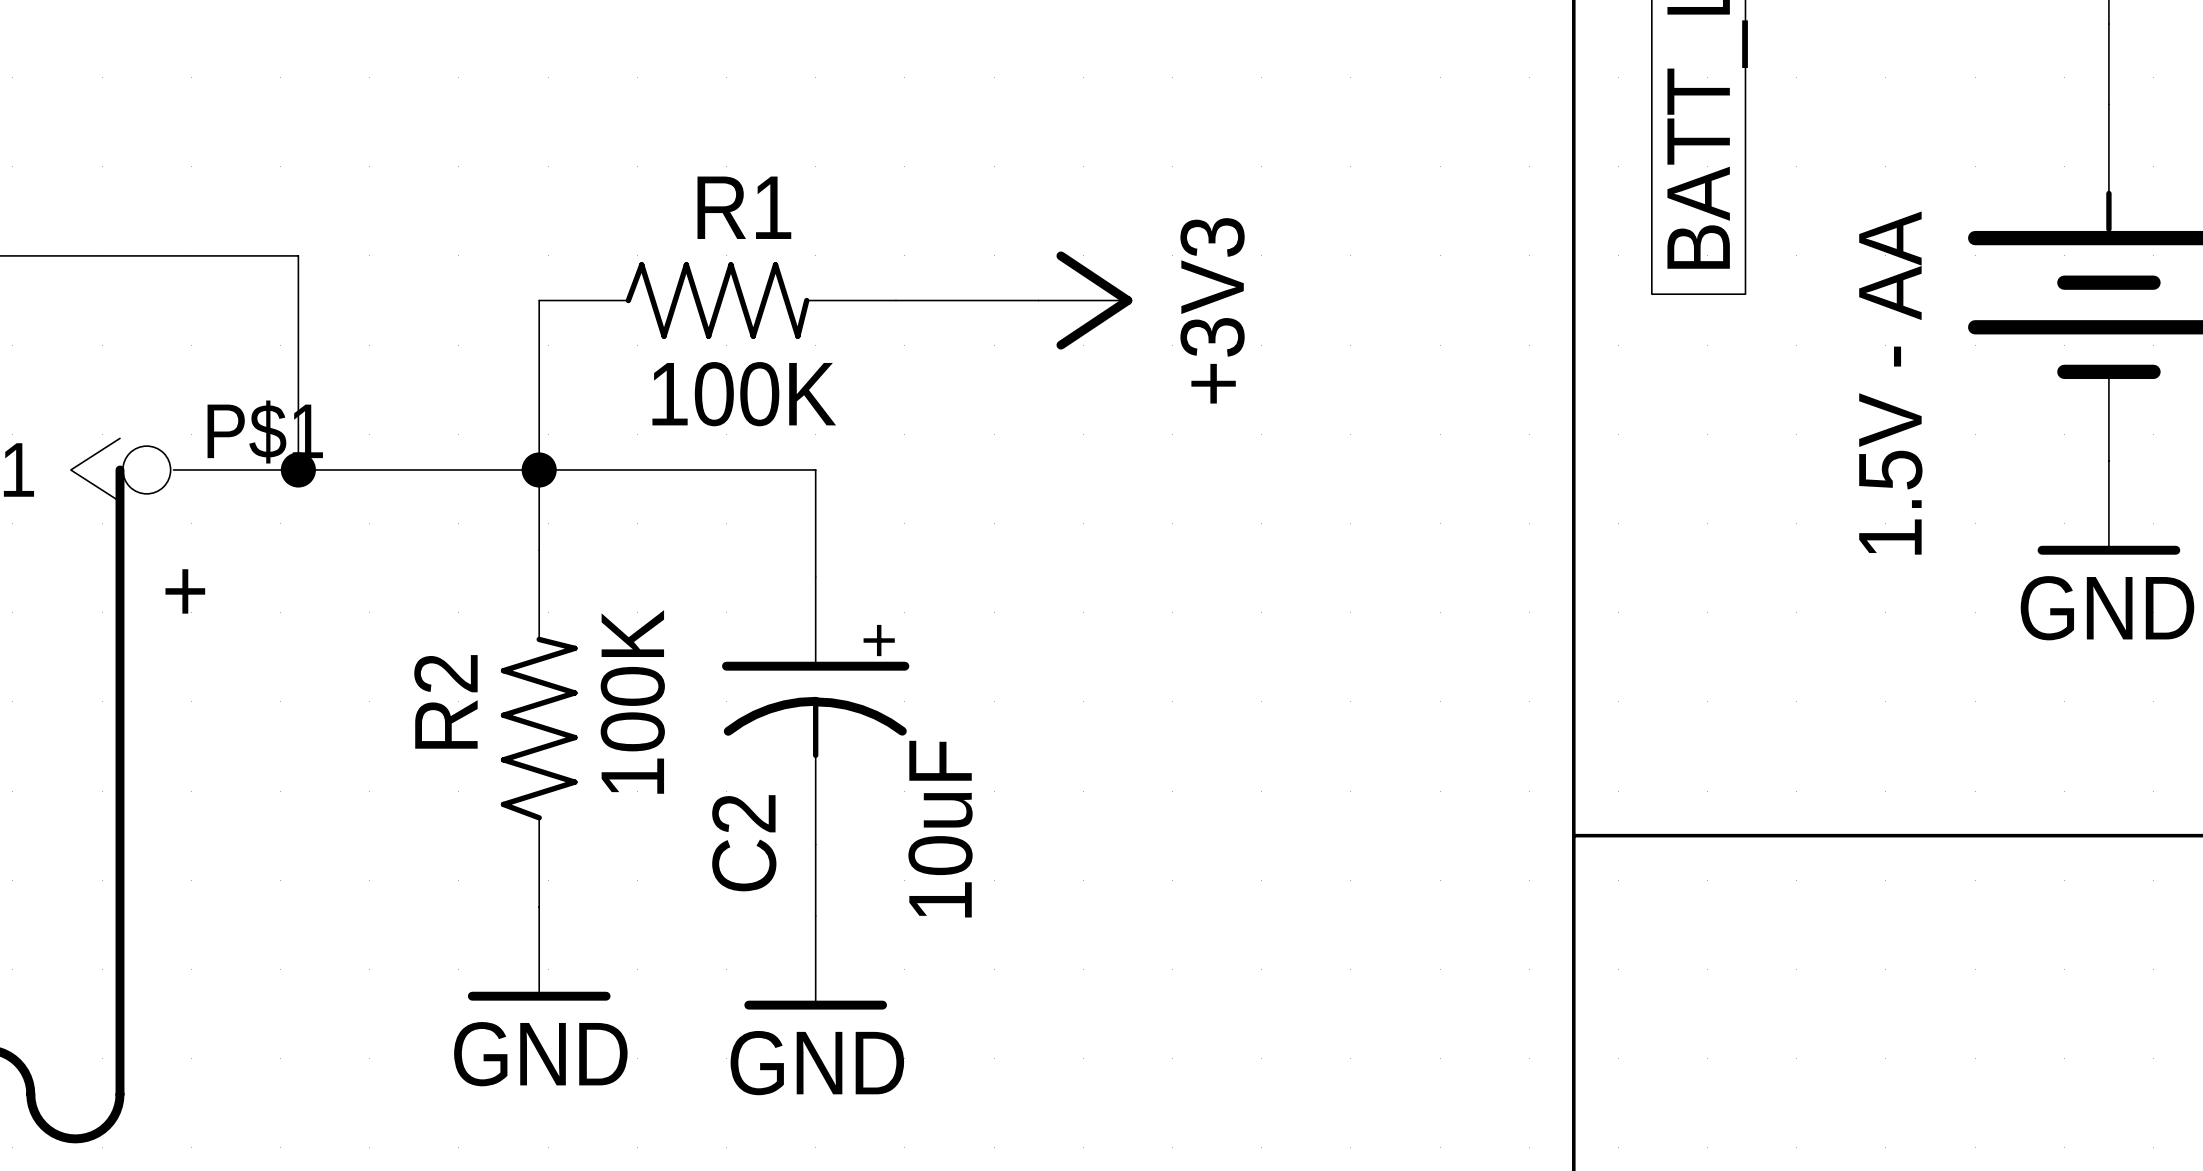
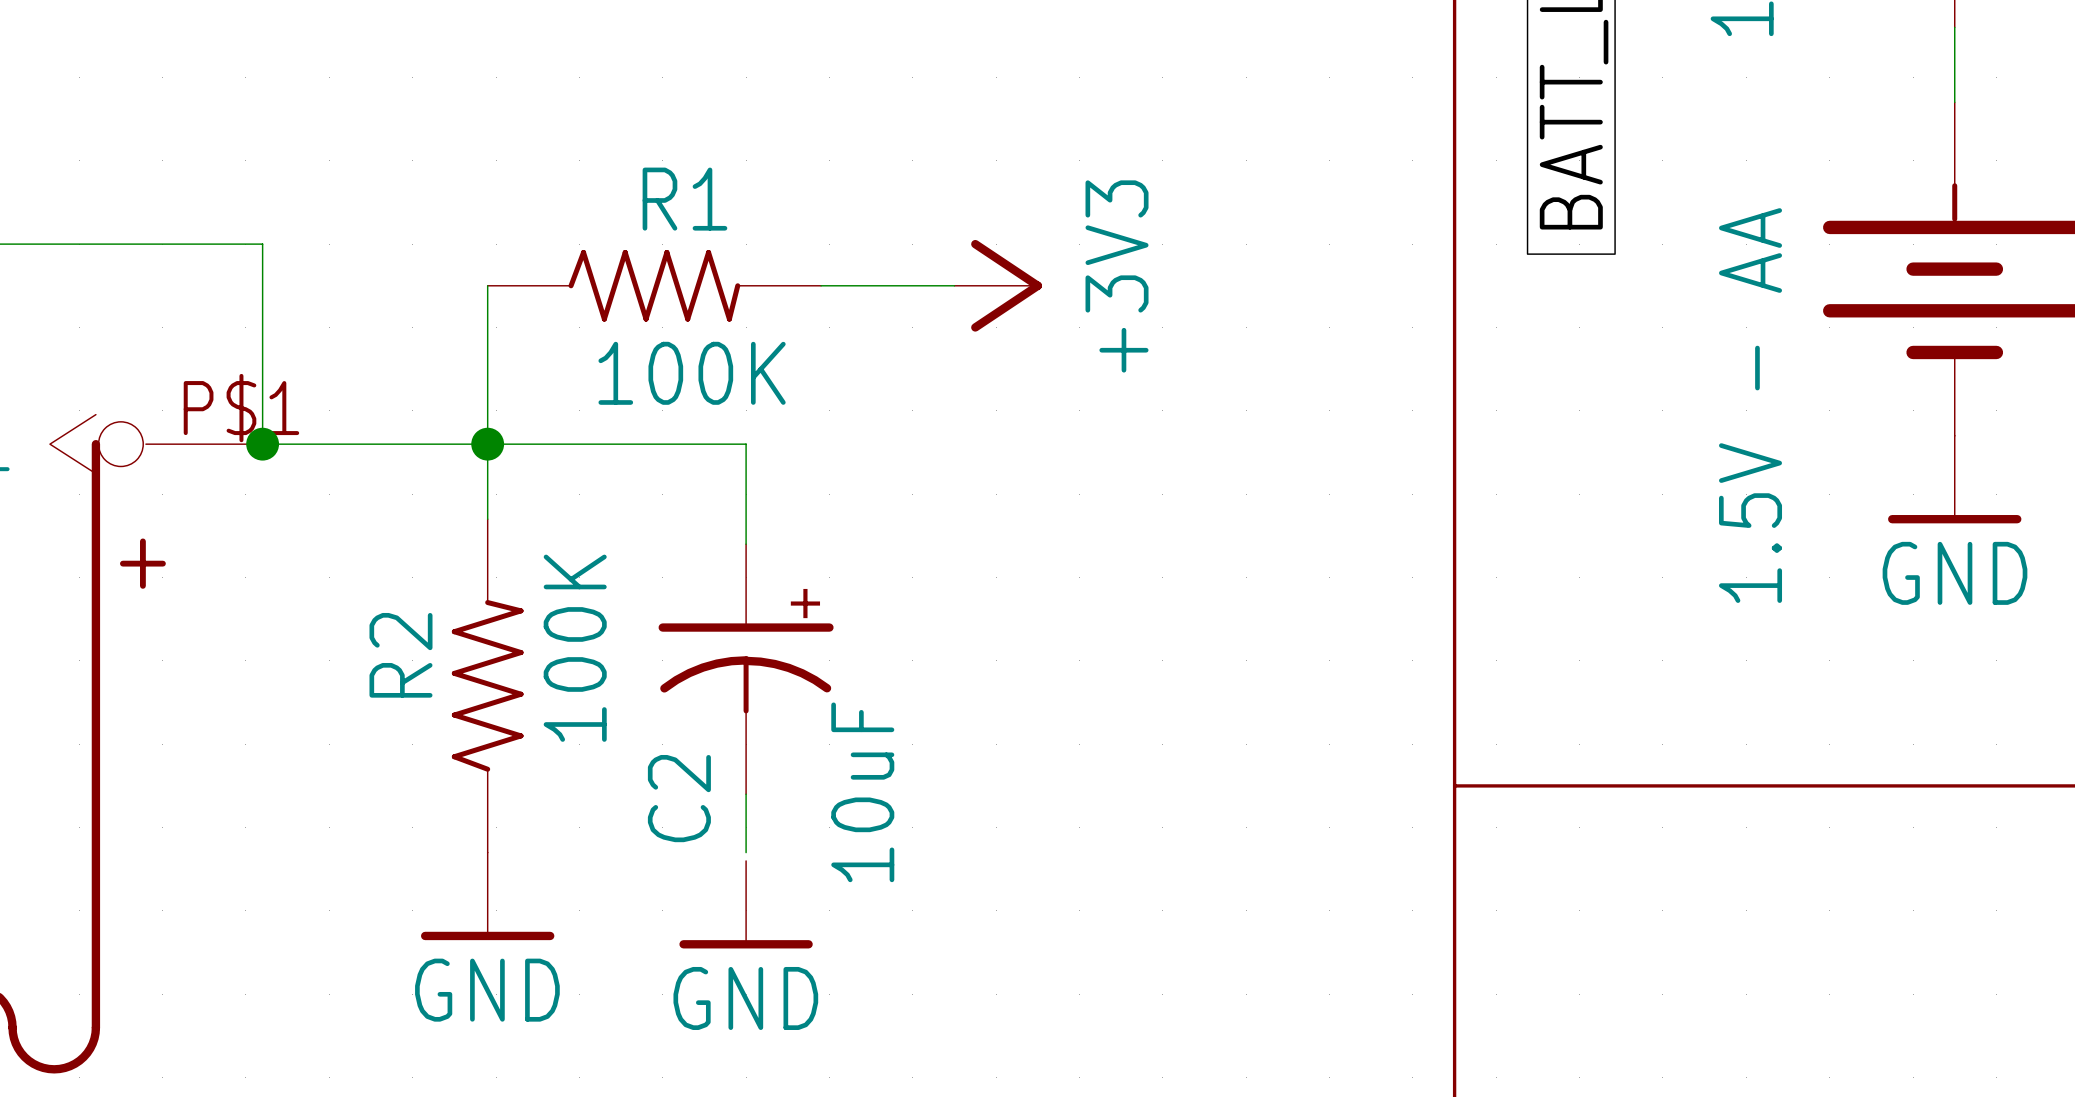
wire: (815, 907) (815, 915) -> none

